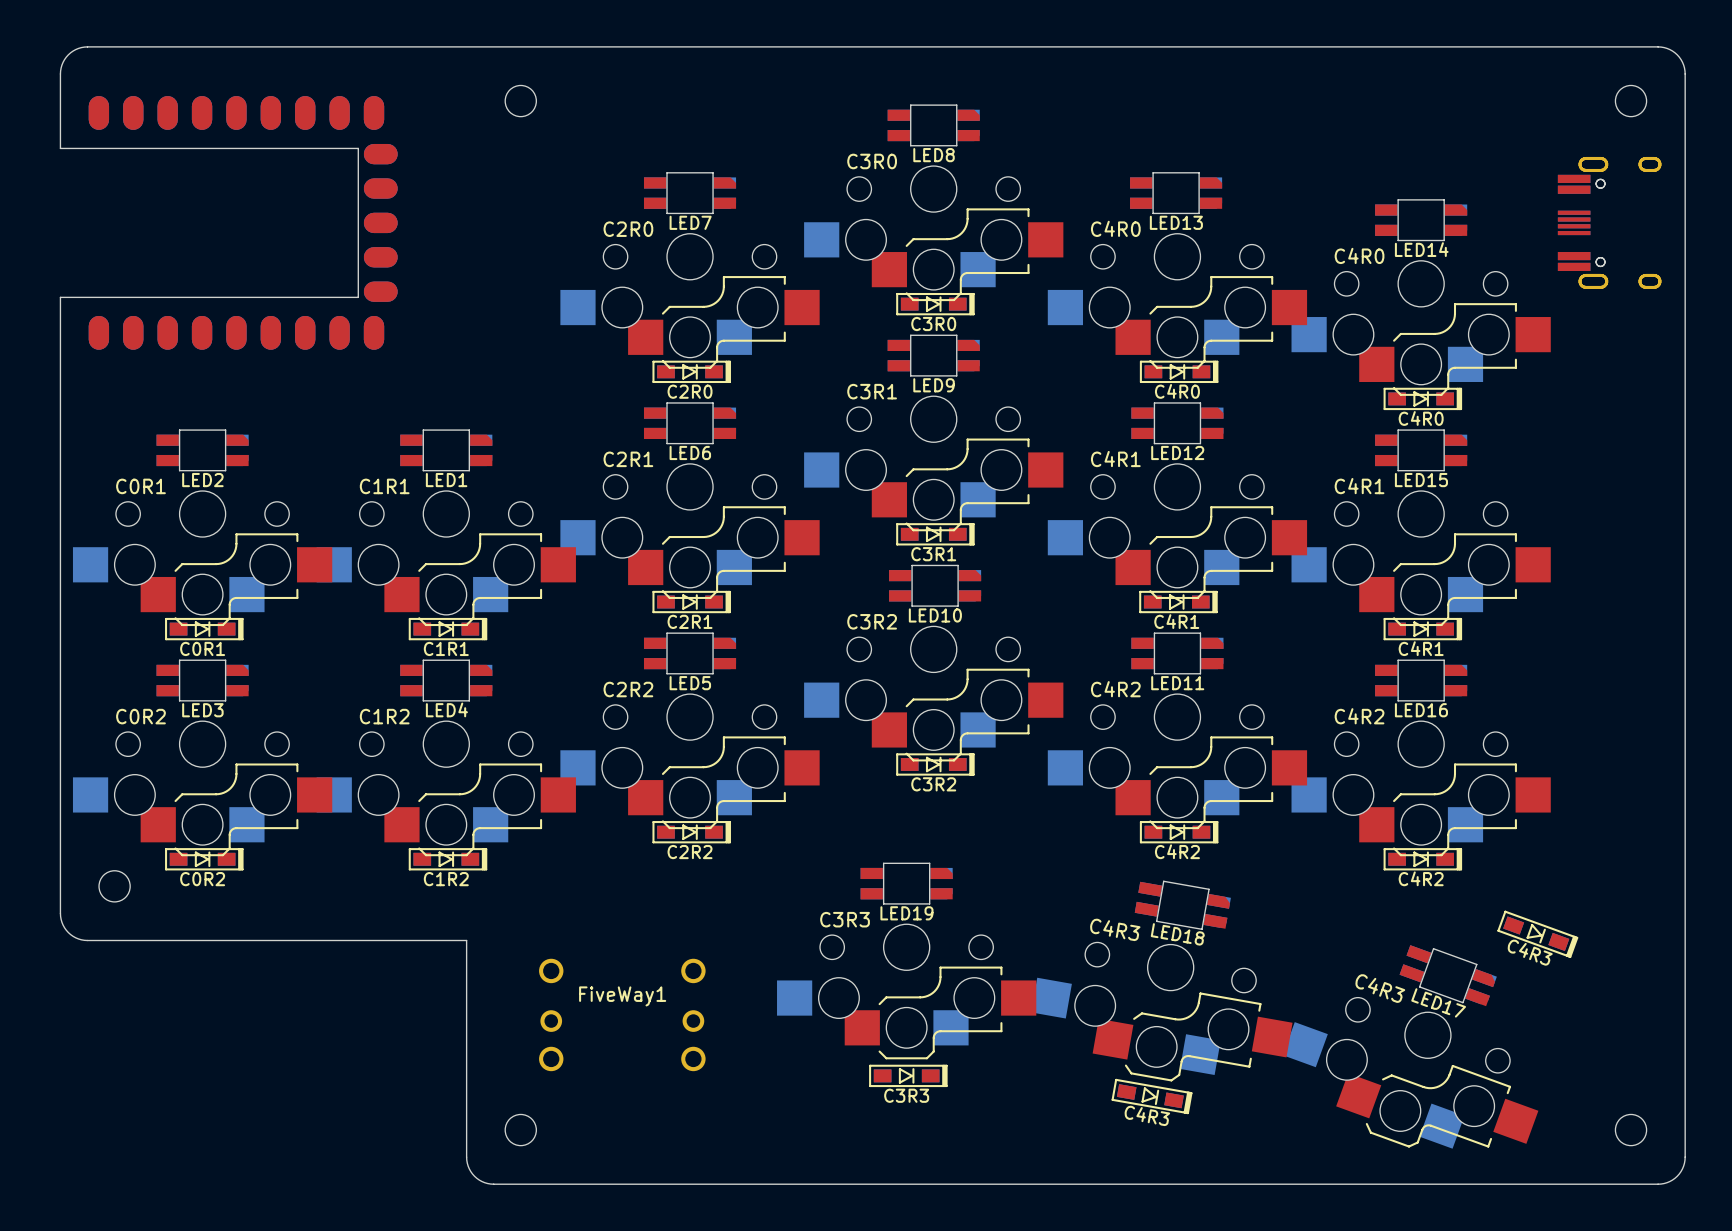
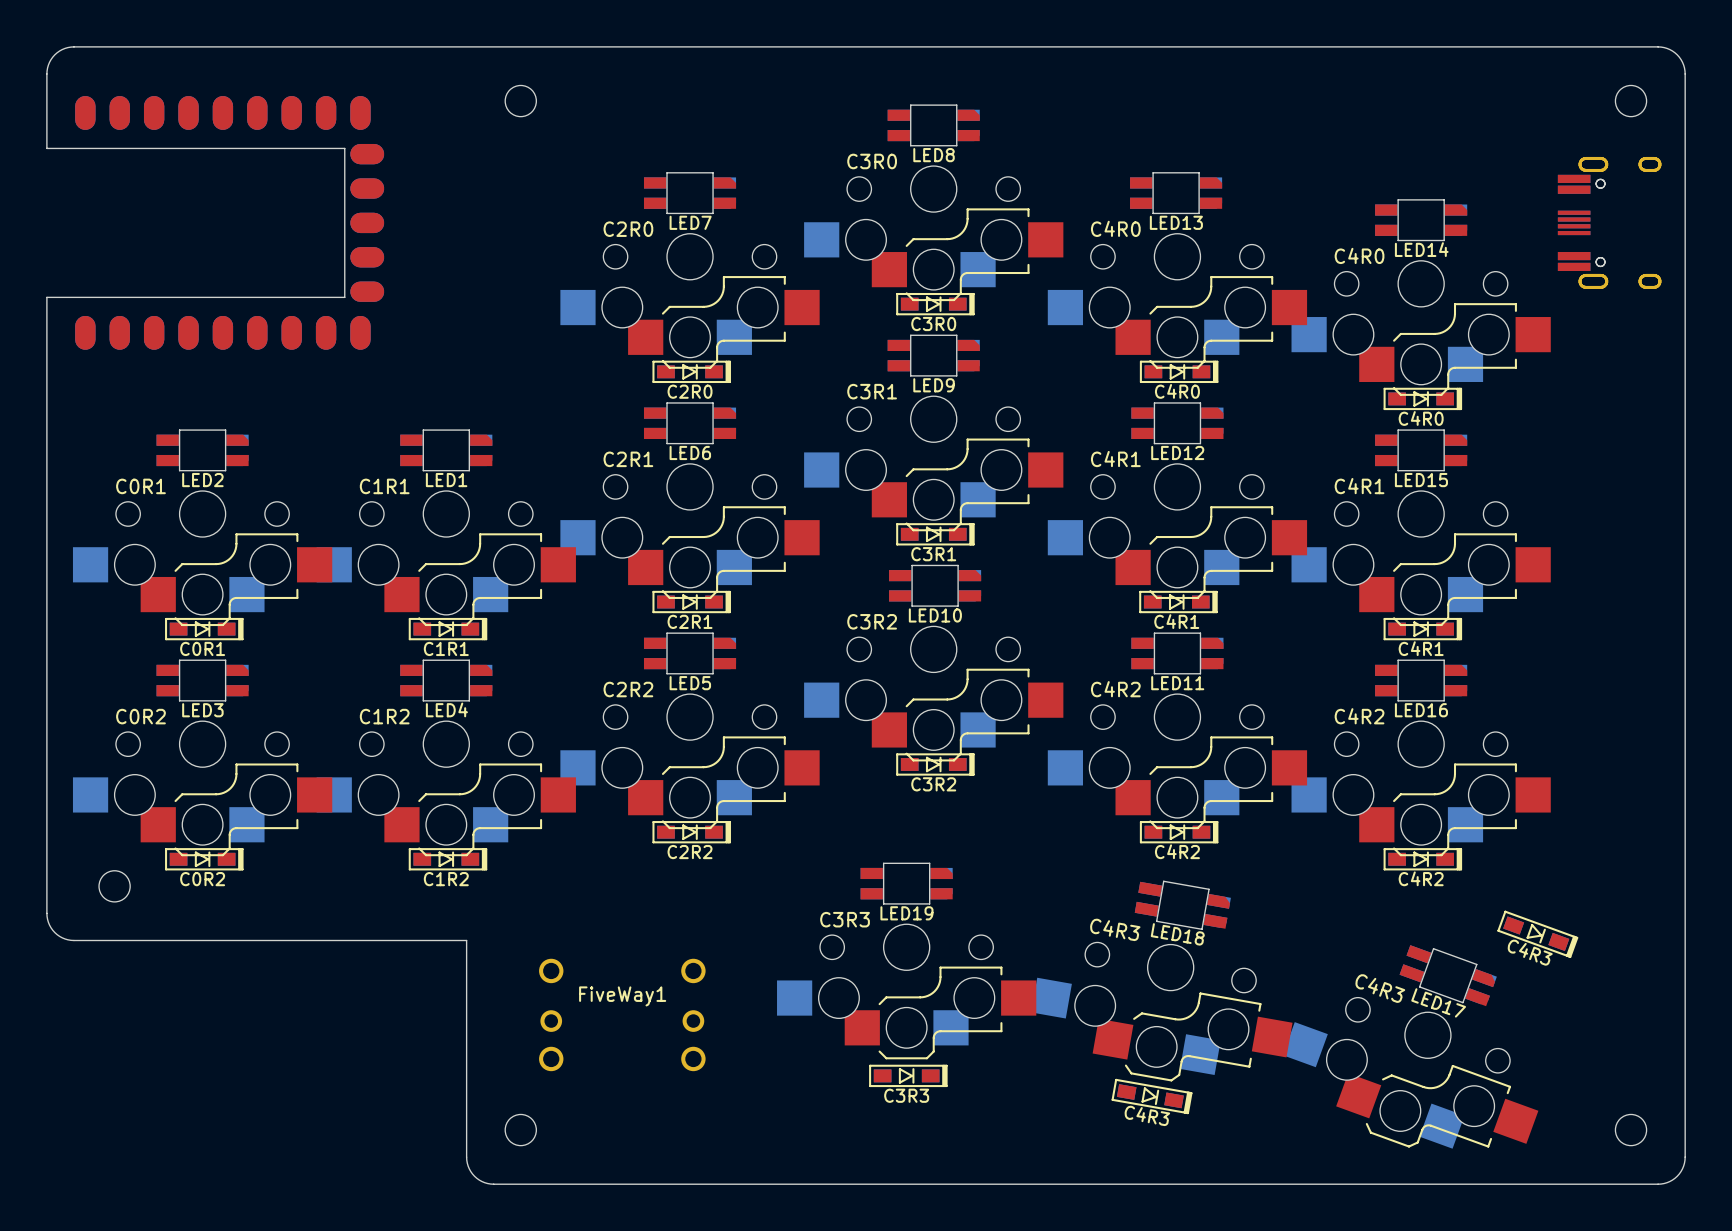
board edge: (87, 46) (78, 48) (70, 52) (64, 59) (61, 67) (60, 148) -> (87, 46) (70, 47) (62, 49) (52, 57) (47, 67) (46, 148) (60, 148)
board edge: (344, 148) (358, 148) (358, 297) (344, 297) -> (344, 148) (344, 297)
part position: (243, 222) -> (229, 222)
board edge: (60, 297) (60, 913) (63, 925) (68, 932) (78, 938) (87, 940) -> (60, 297) (46, 297) (46, 913) (49, 925) (59, 936) (70, 940) (87, 940)

